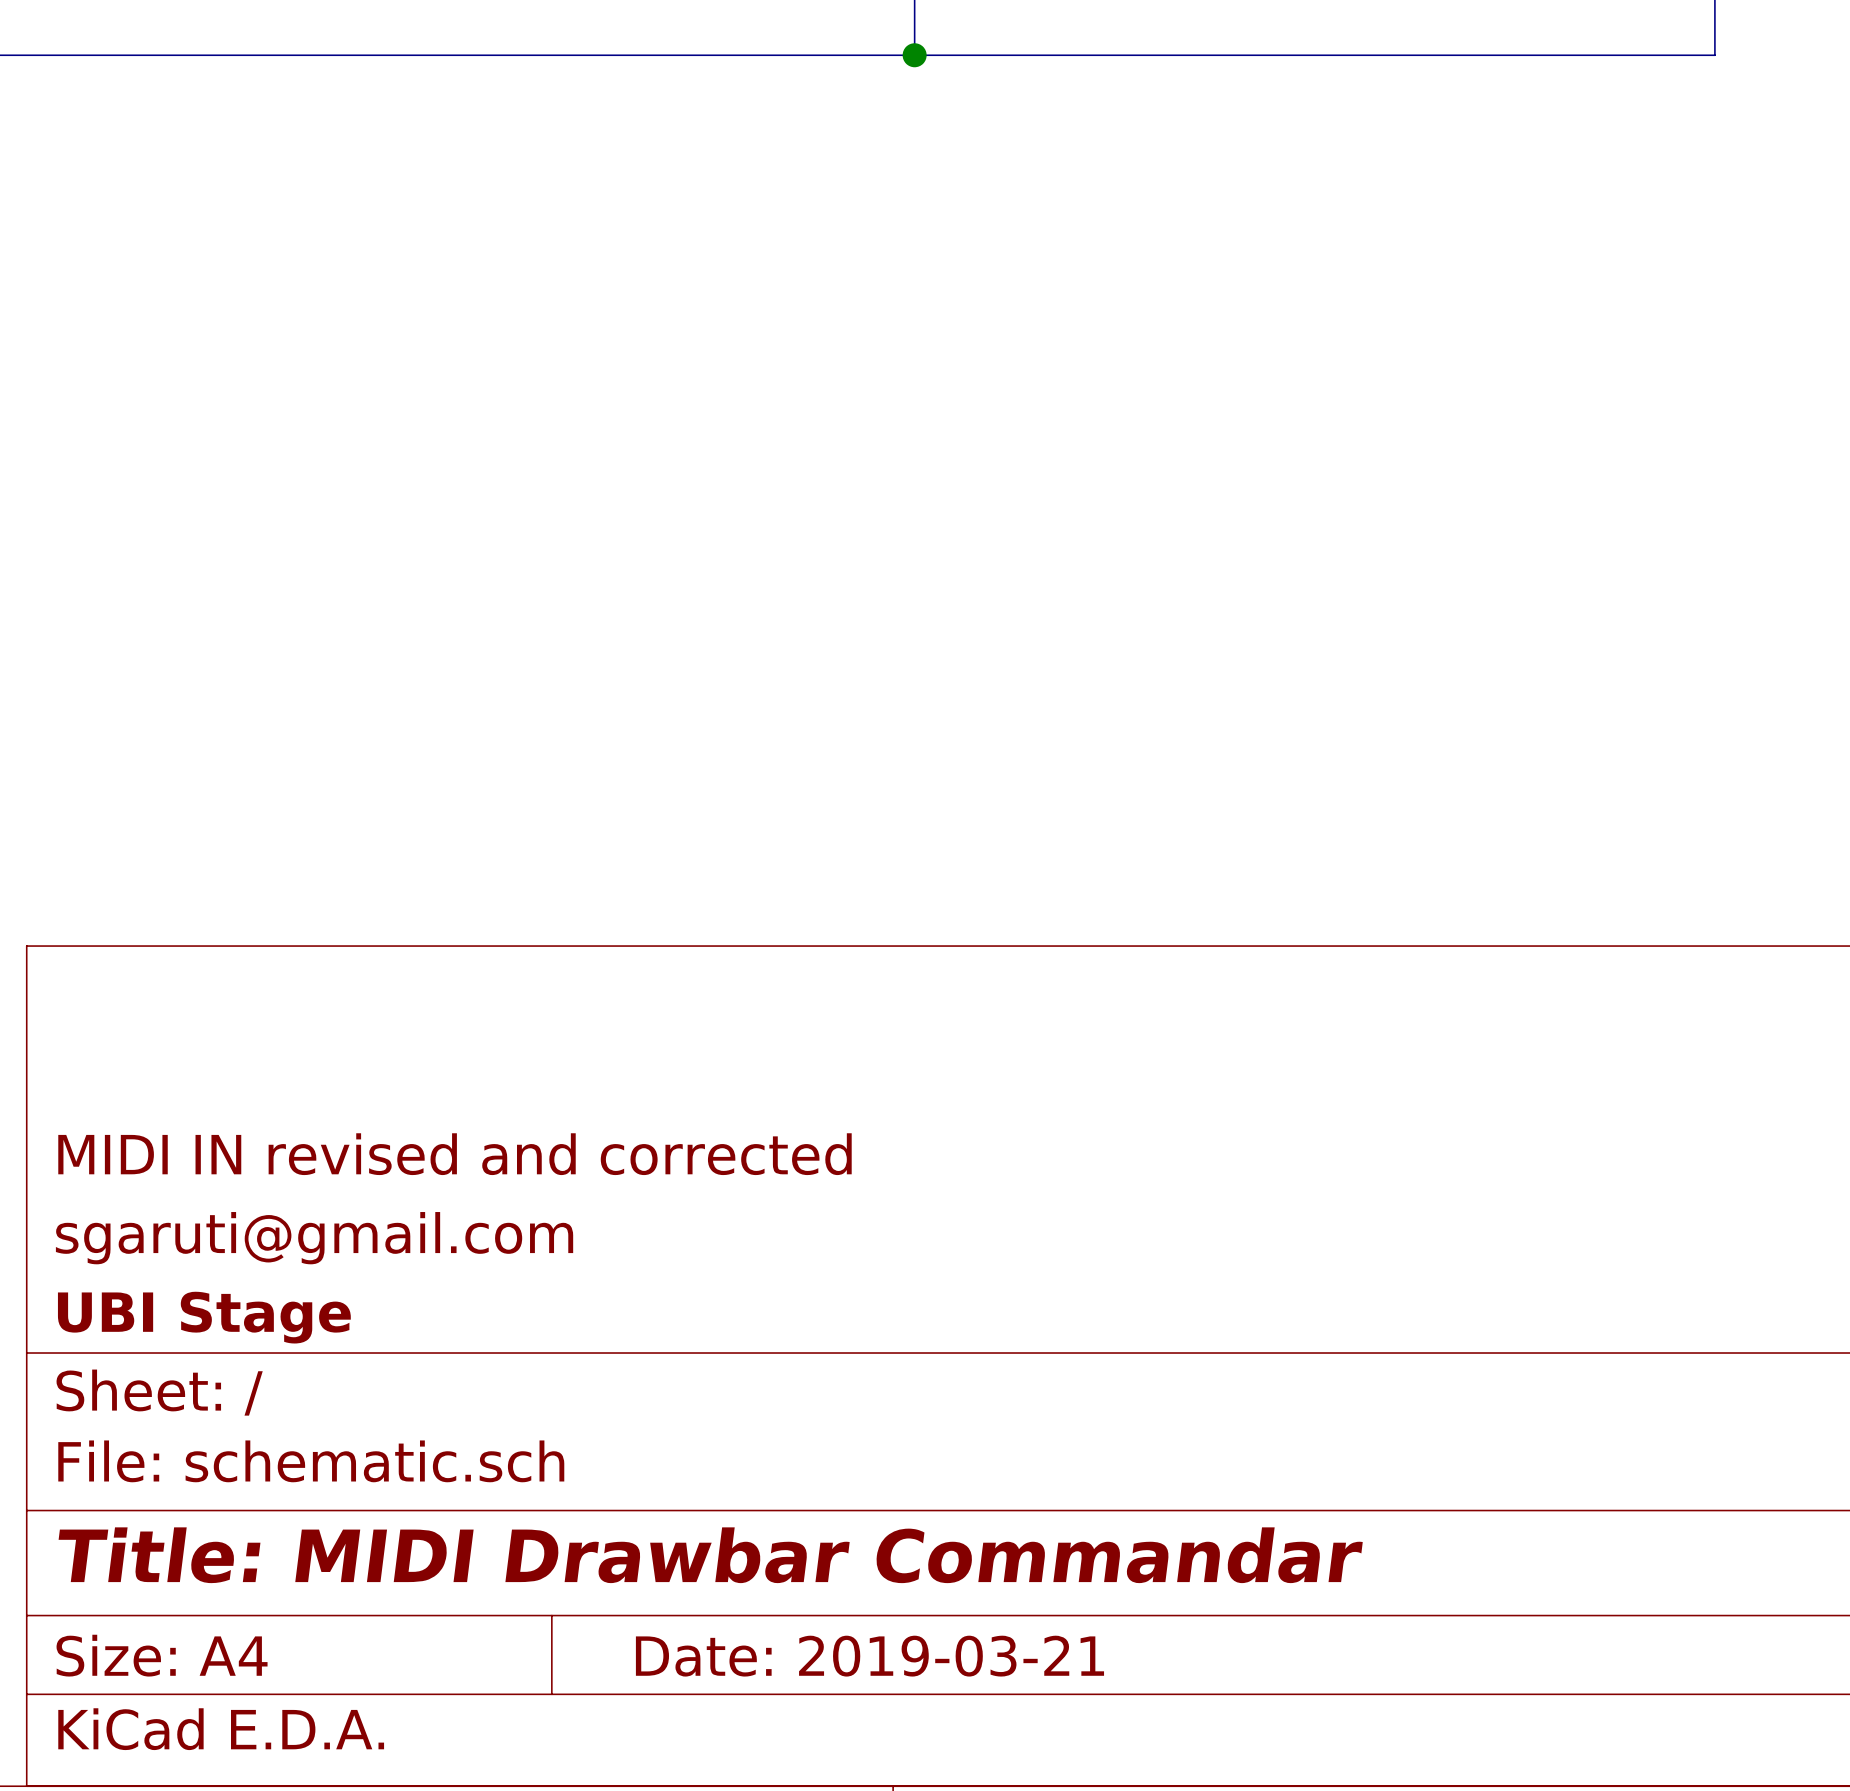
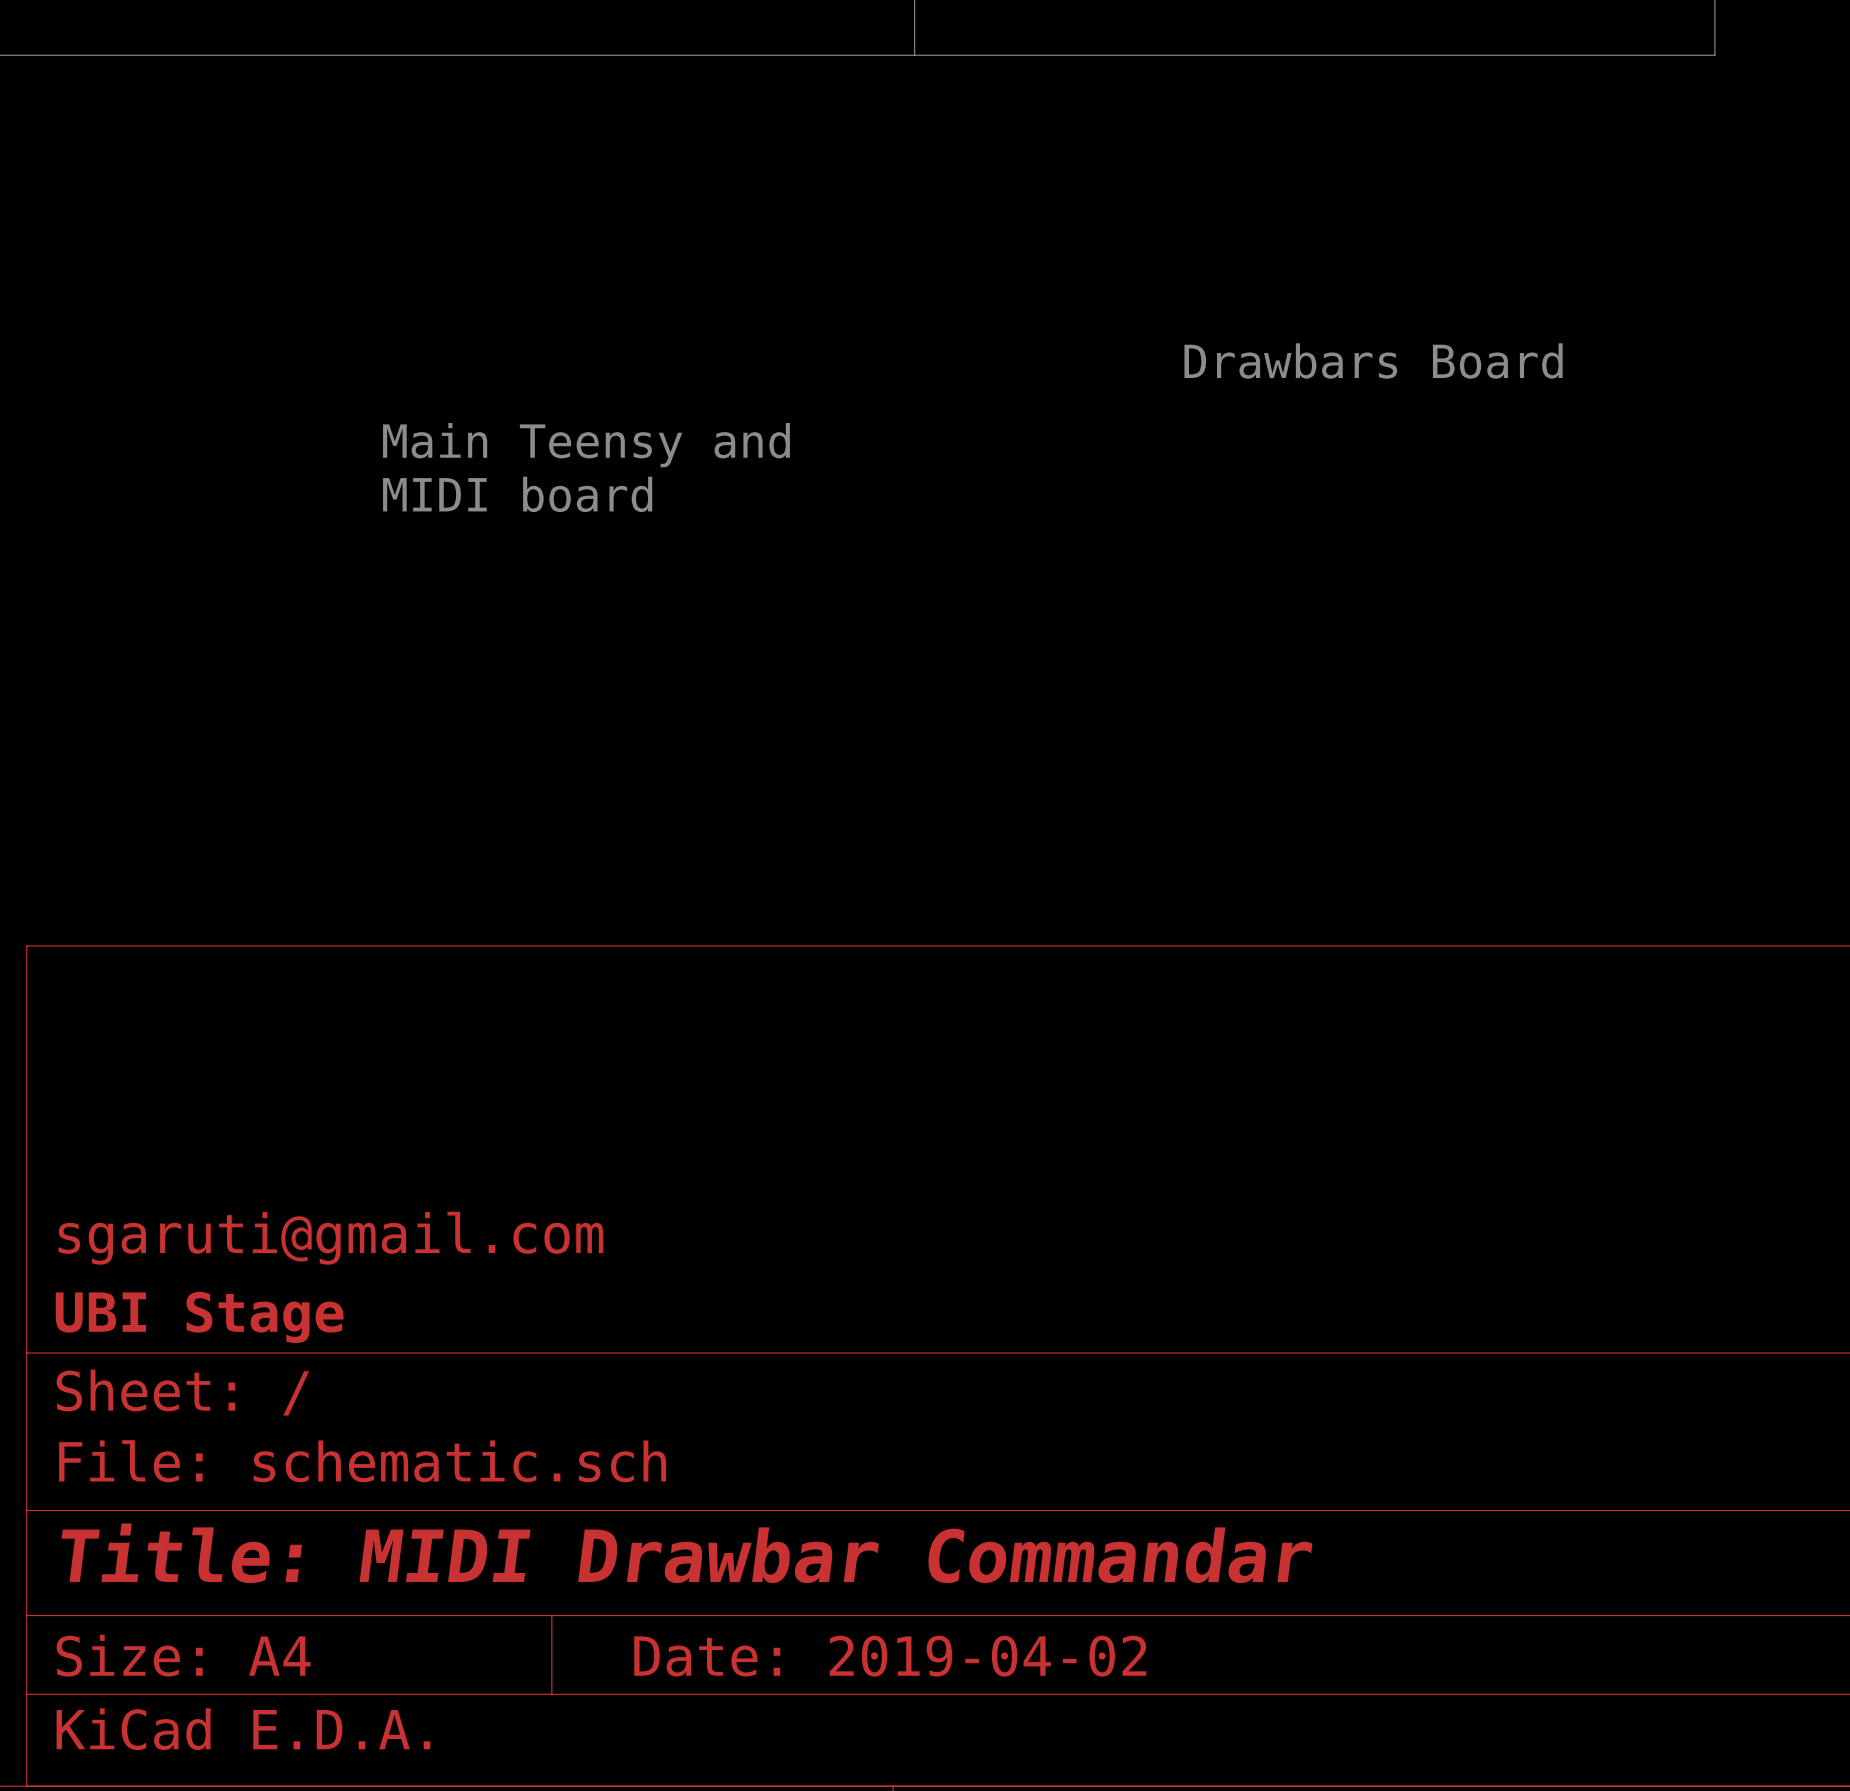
junction: (914, 55) -> none
text: none -> Drawbars Board (1373, 361)
text: none -> Main Teensy and (586, 445)
text: none -> MIDI board (517, 494)
title block: MIDI IN revised and corrected (454, 1154) -> none
title block: Date: 2019-03-21 (869, 1656) -> Date: 2019-04-02 (890, 1656)

